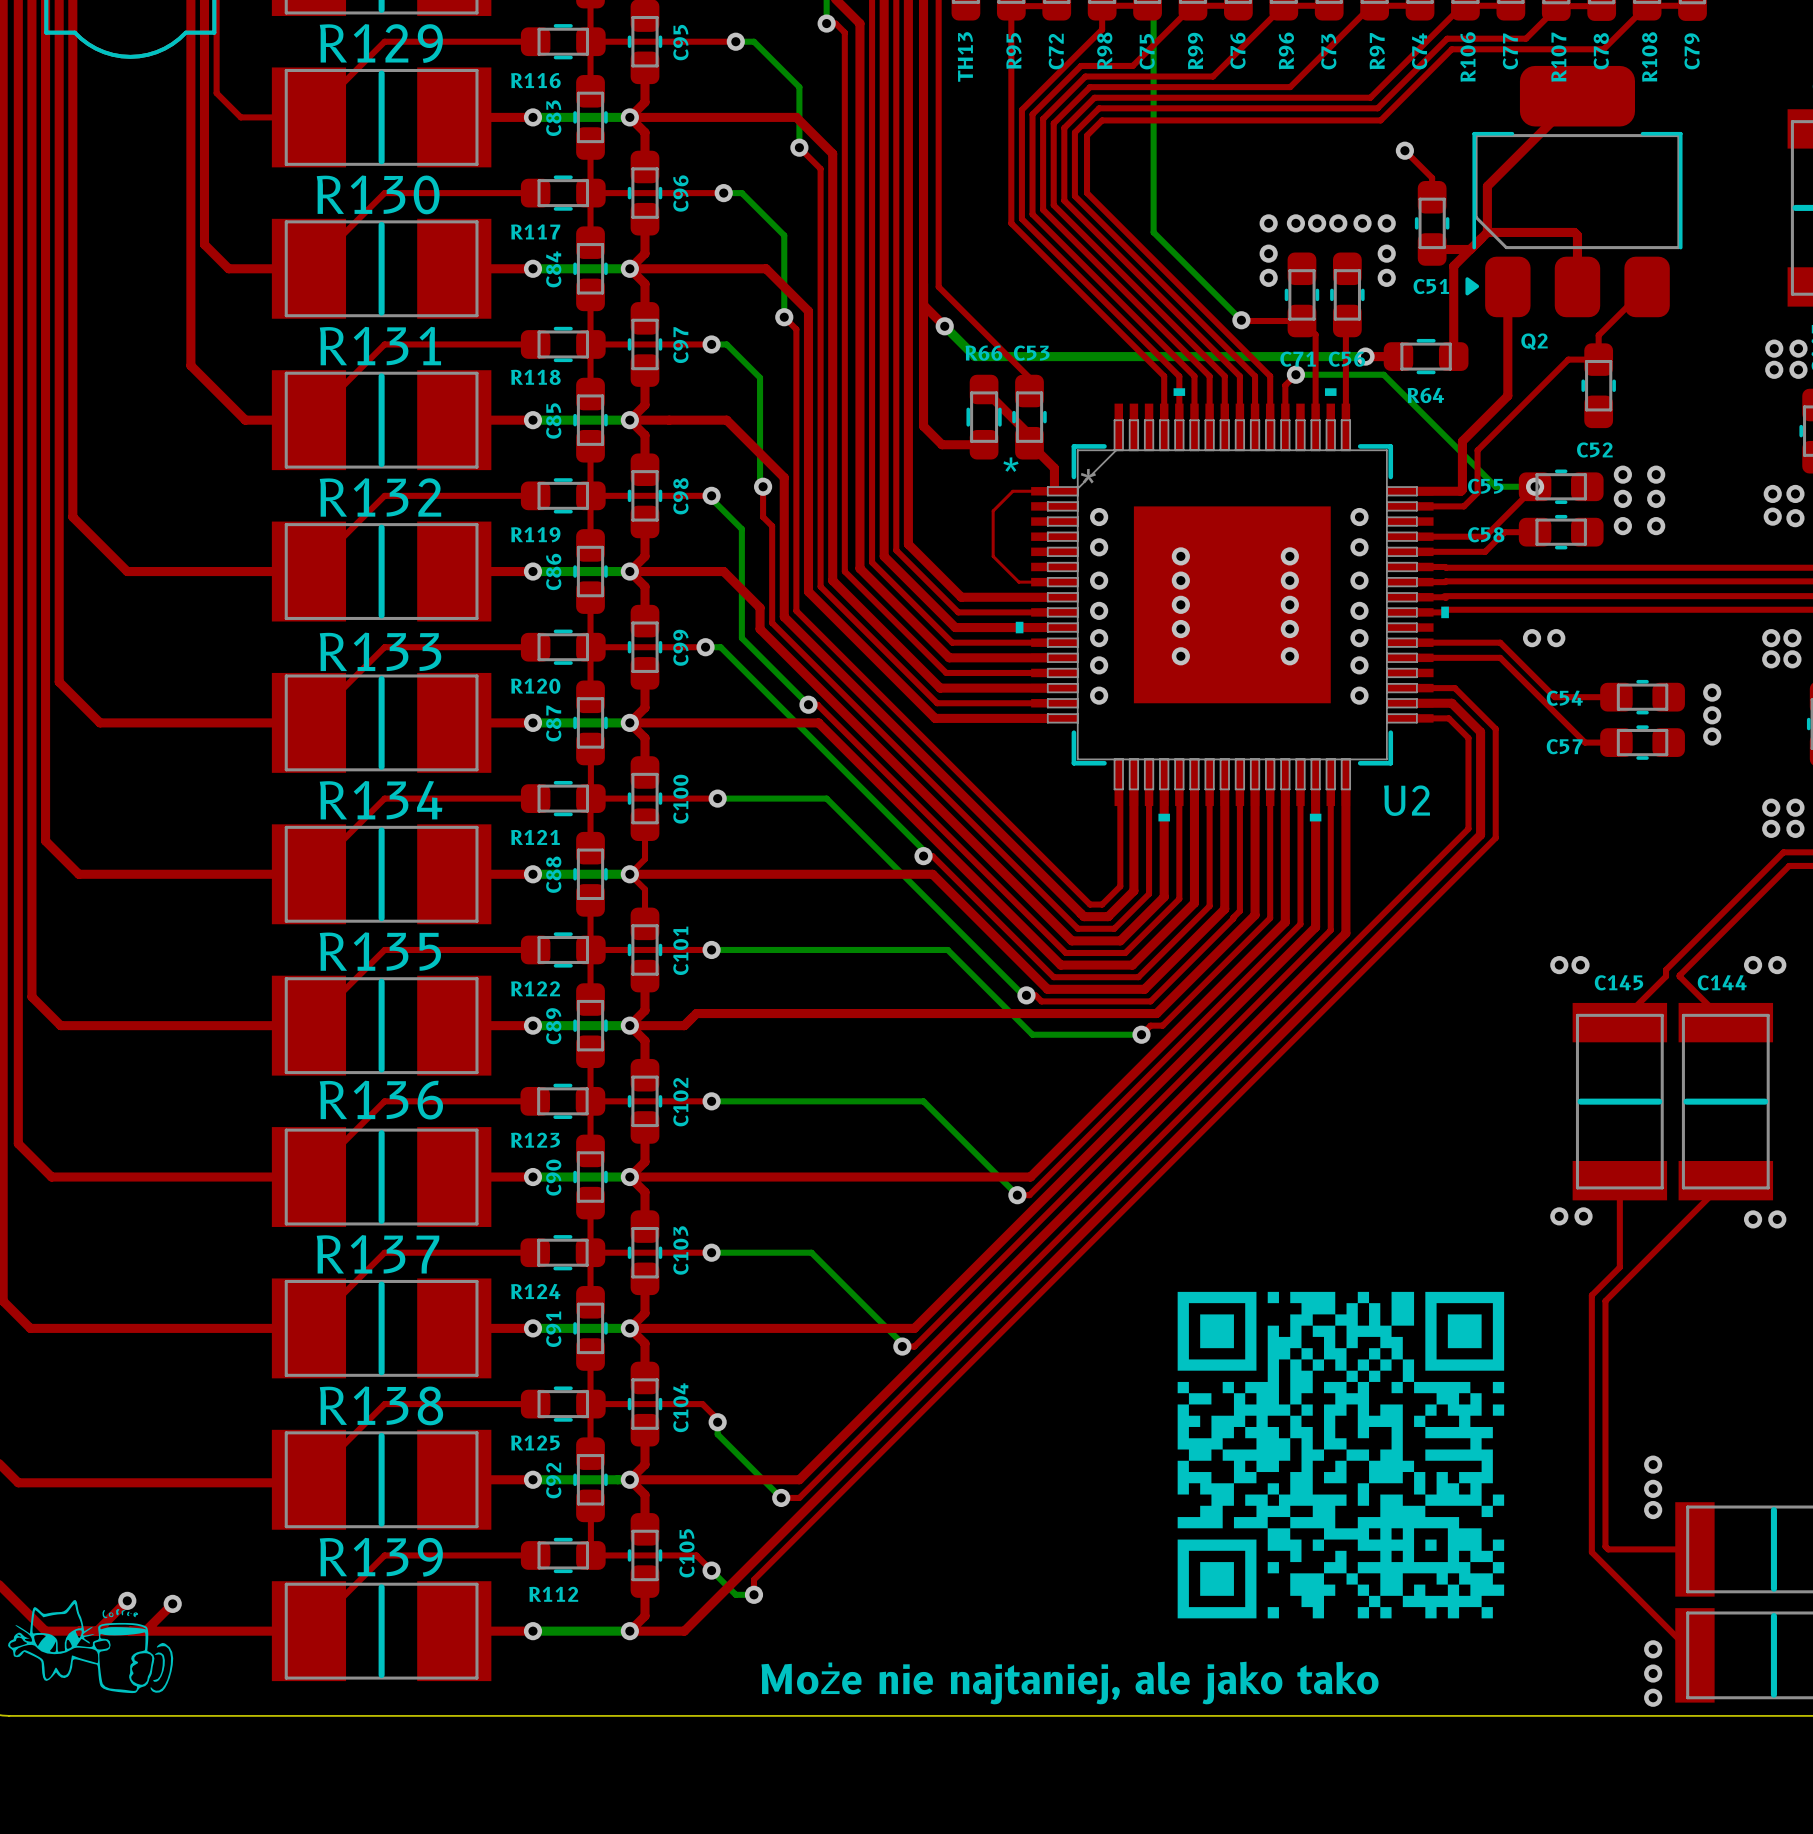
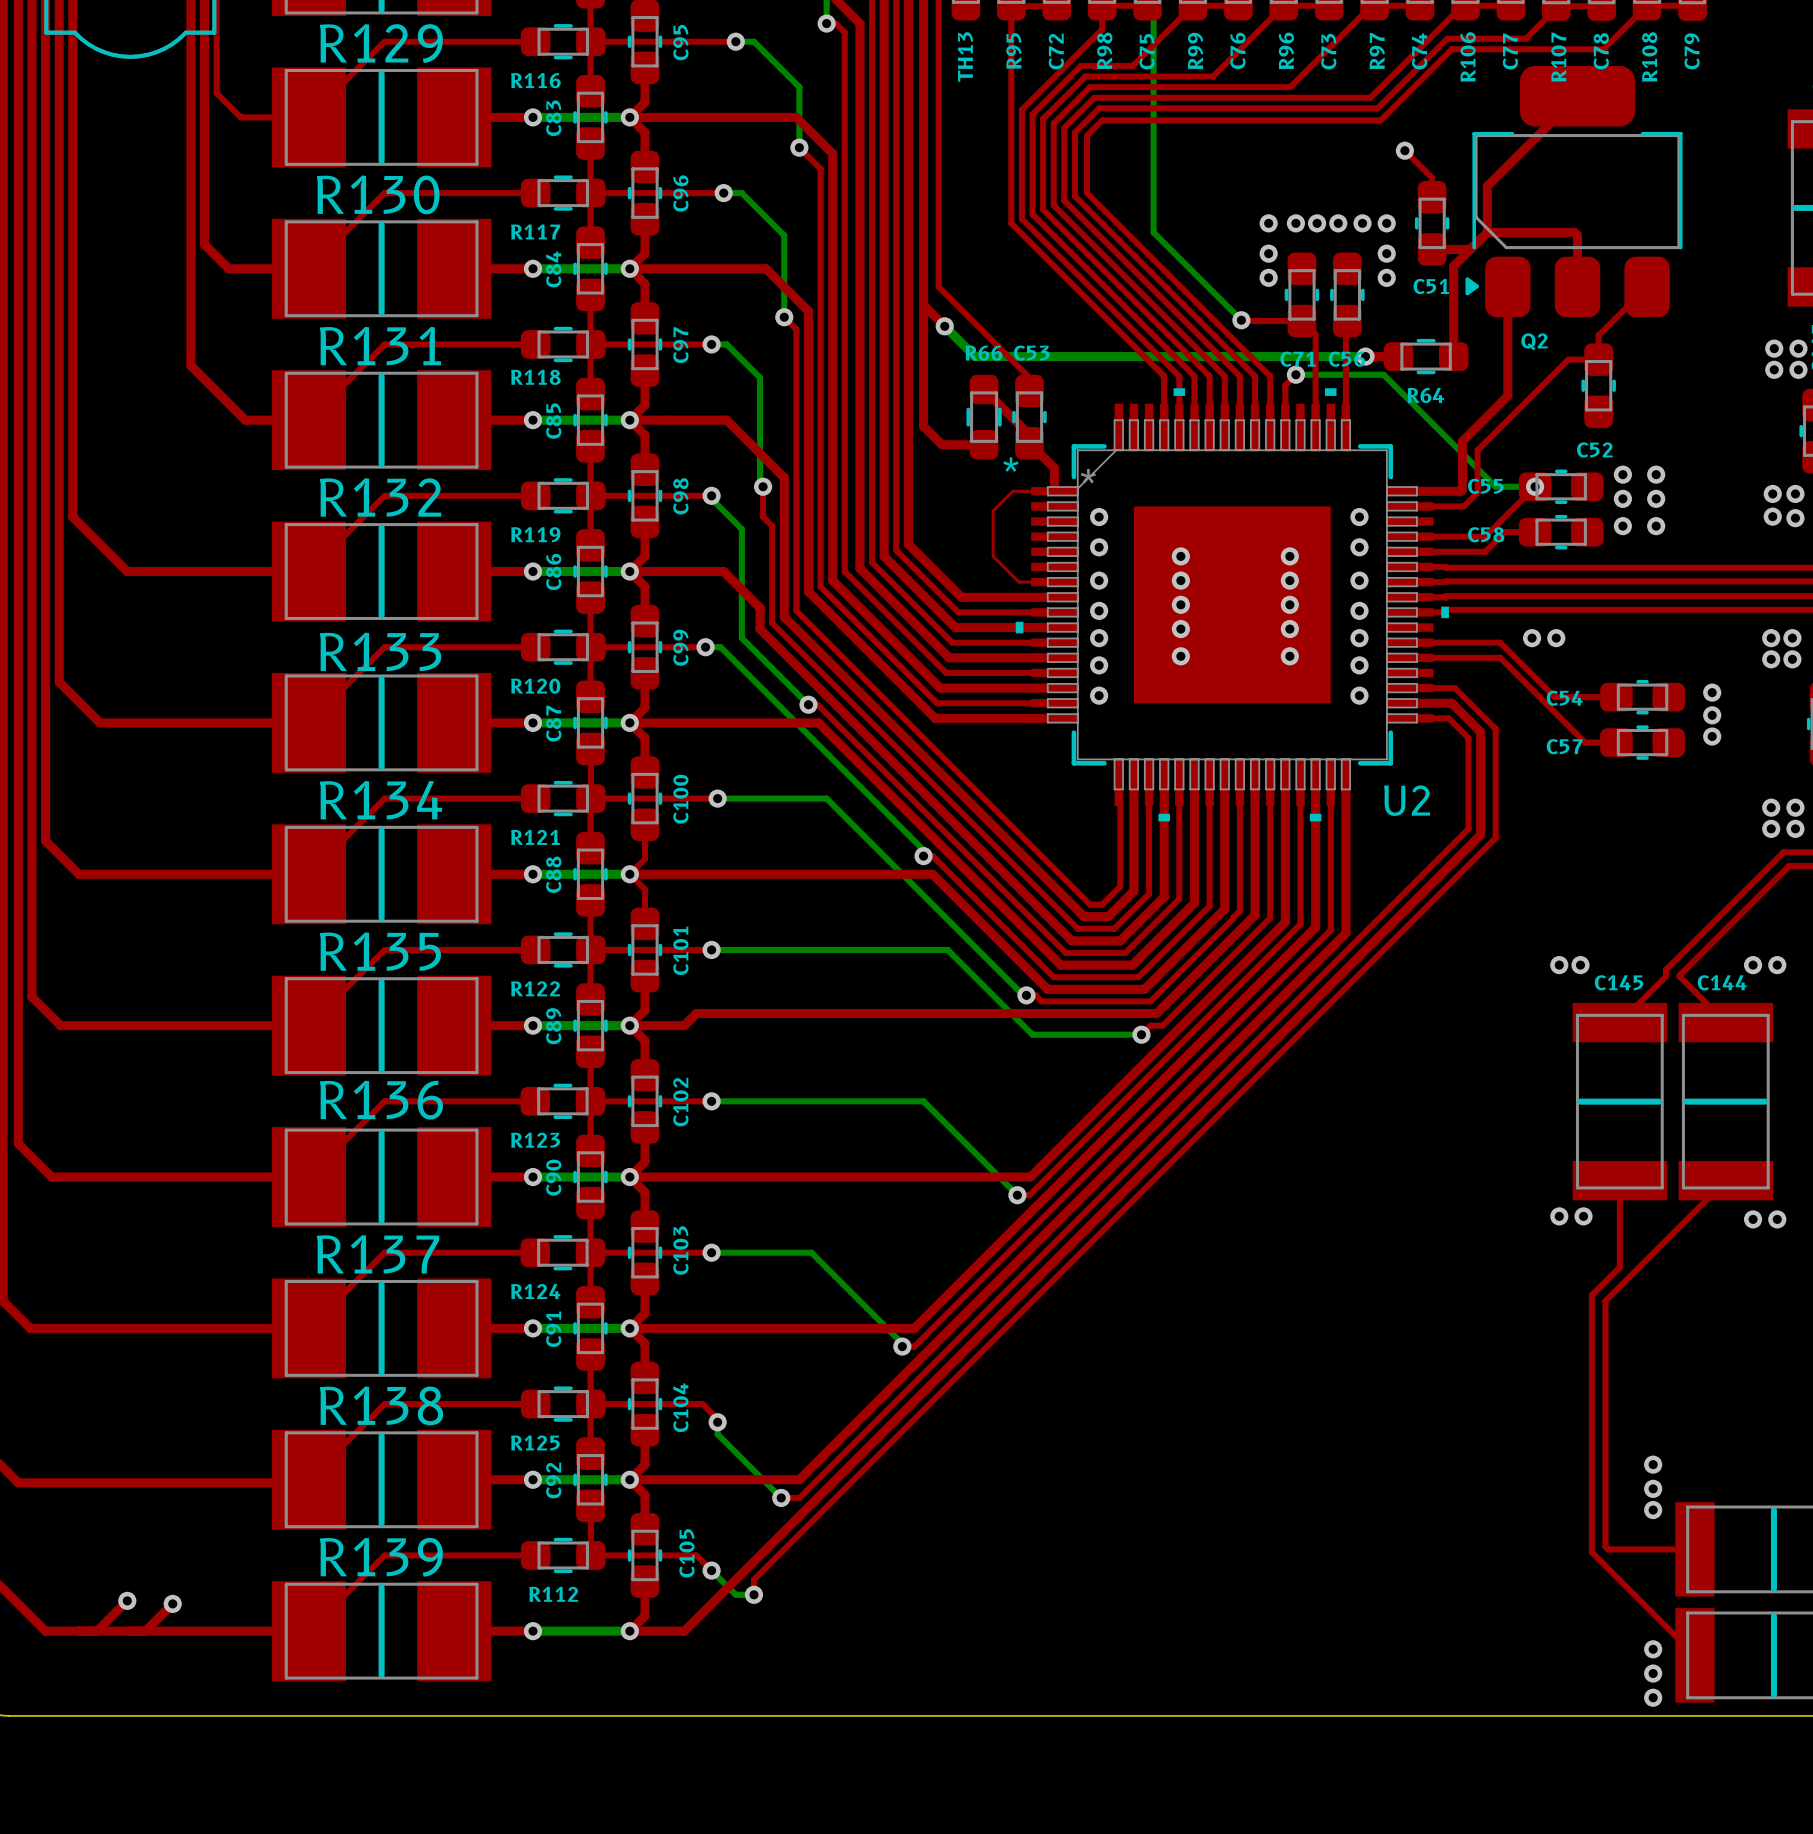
drawing: [1177, 1291, 1505, 1619] -> none
drawing: [8, 1600, 174, 1694] -> none
text: Może nie najtaniej, ale jako tako (1070, 1683) -> none

